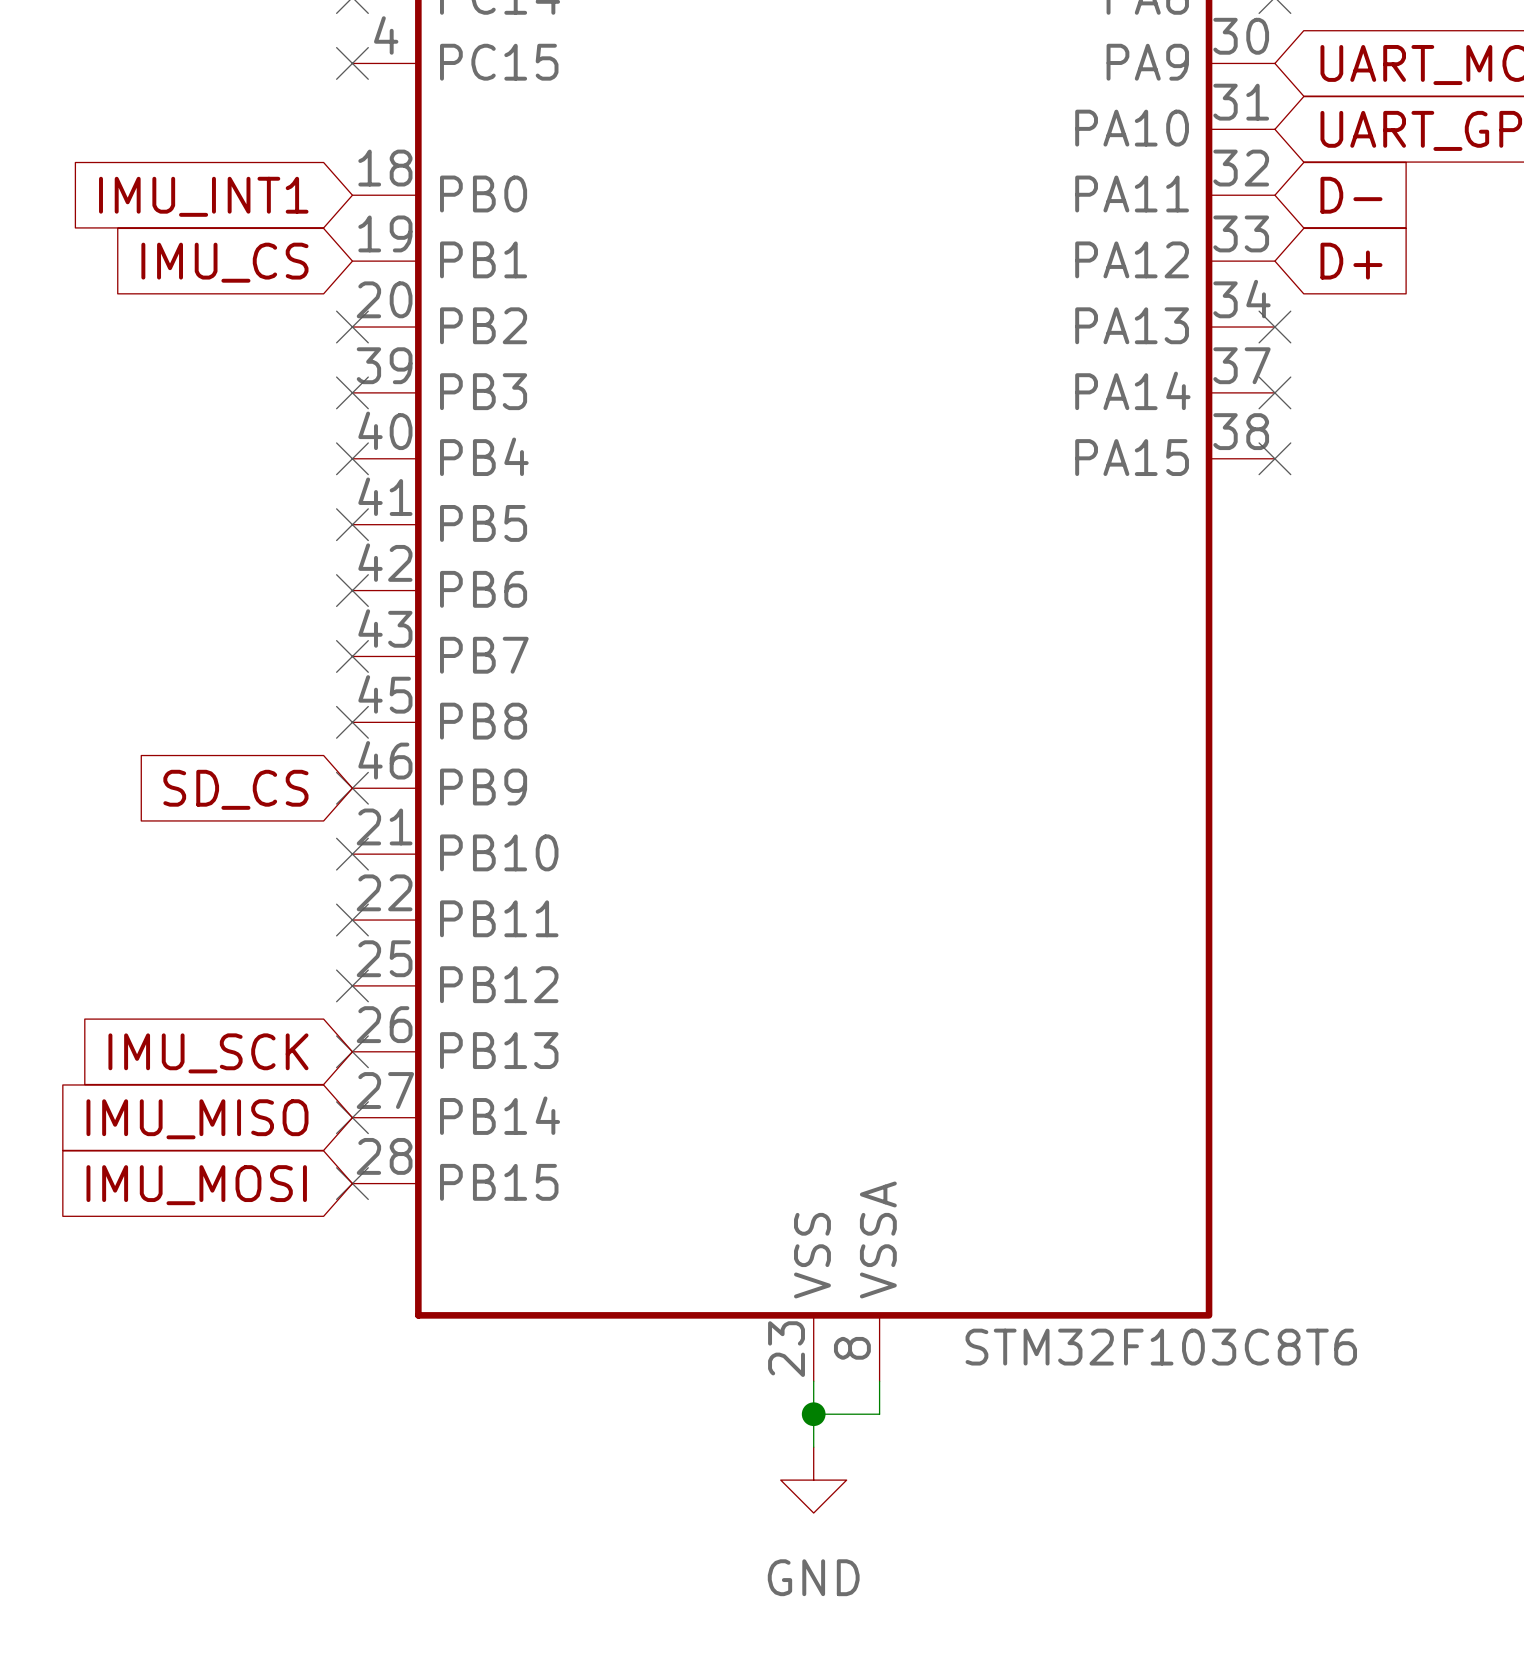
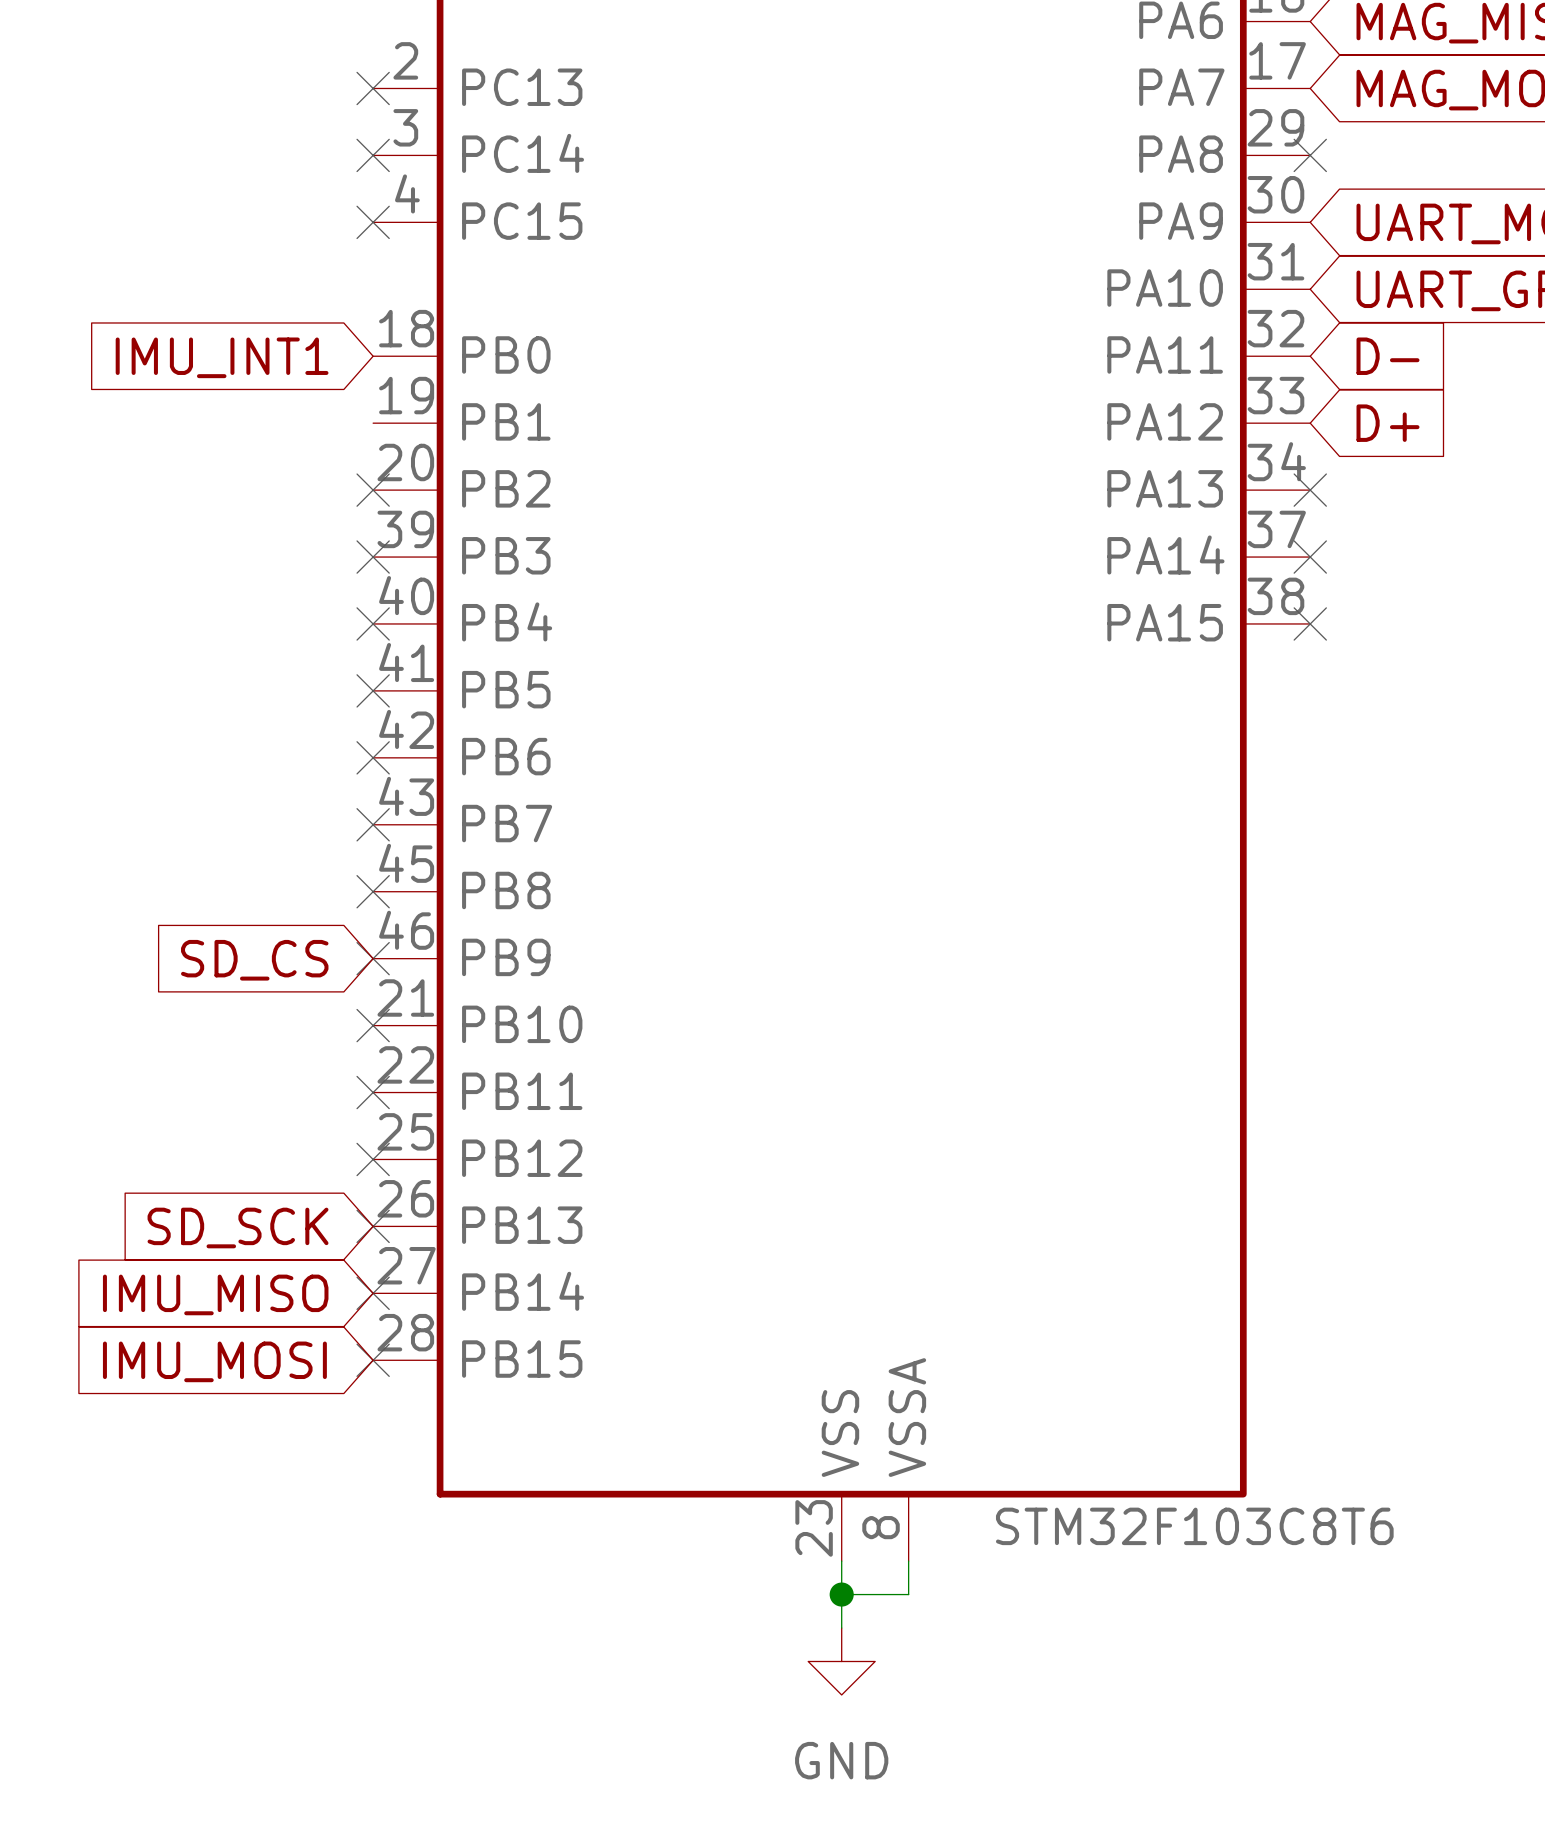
global label: IMU_CS (224, 262) -> none
global label: IMU_SCK (208, 1053) -> SD_SCK (238, 1228)

